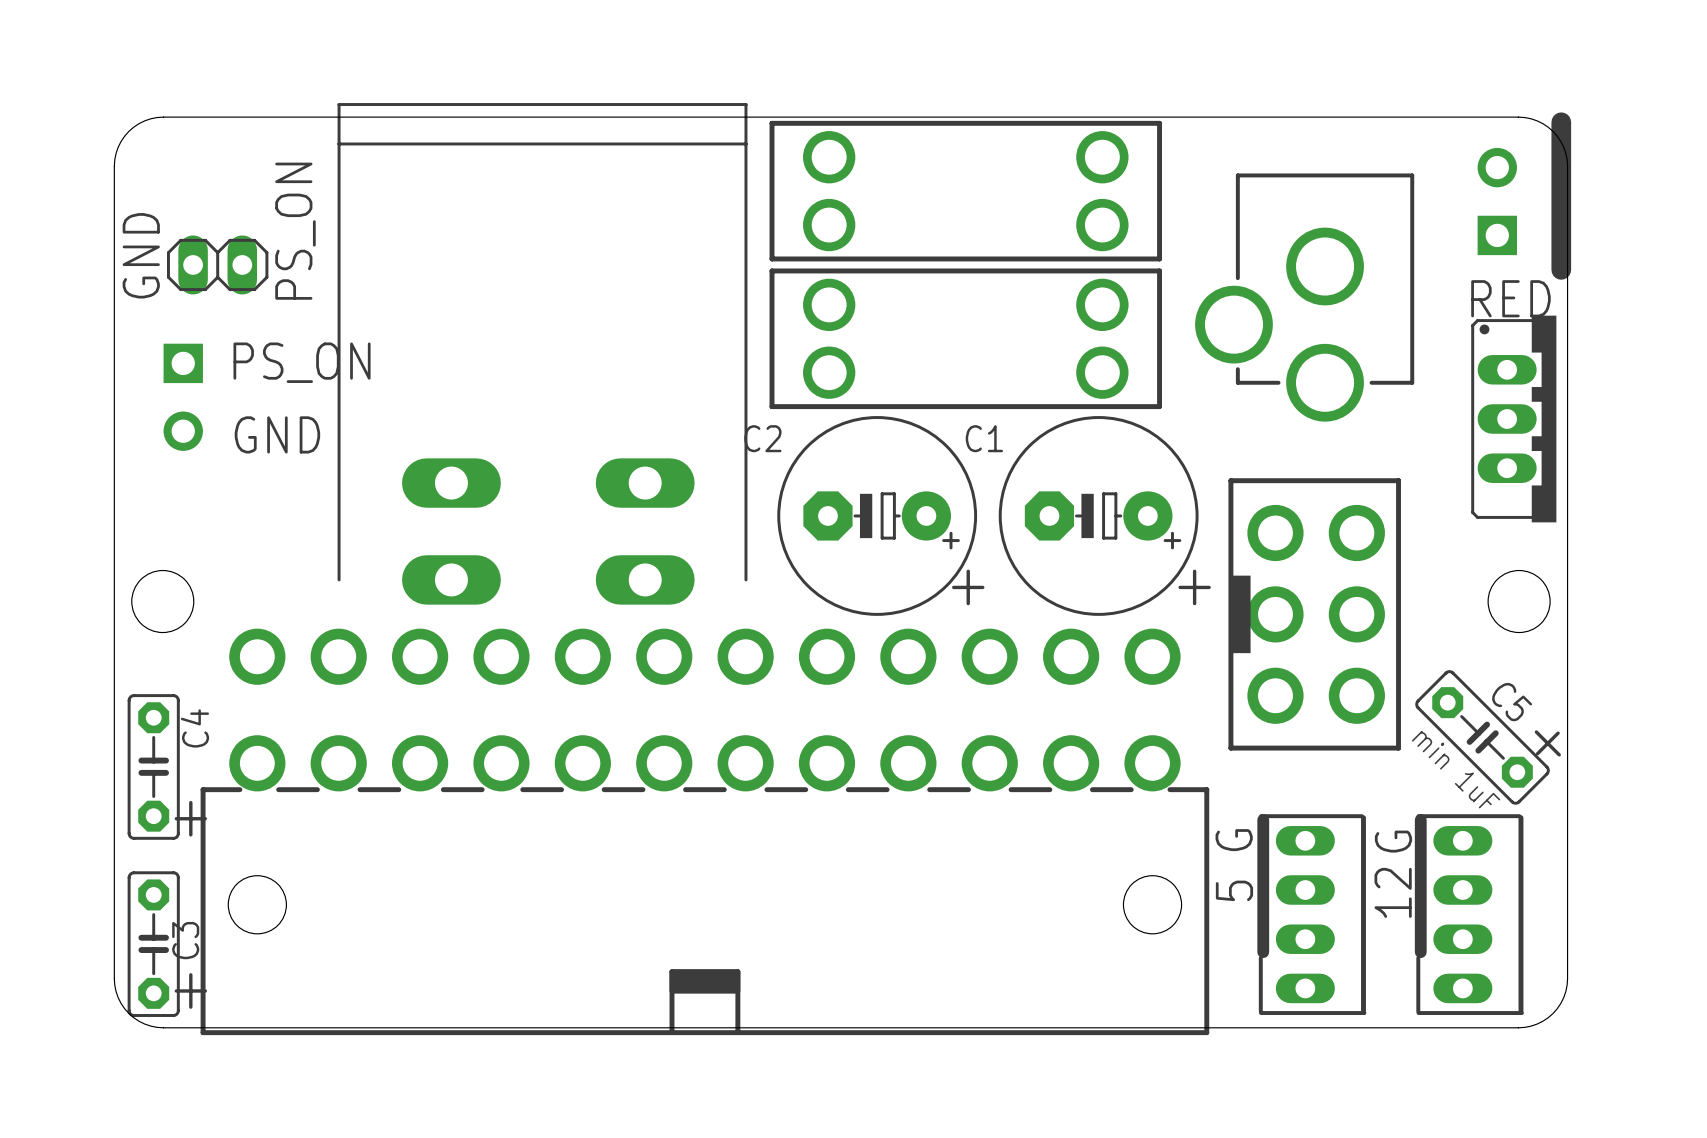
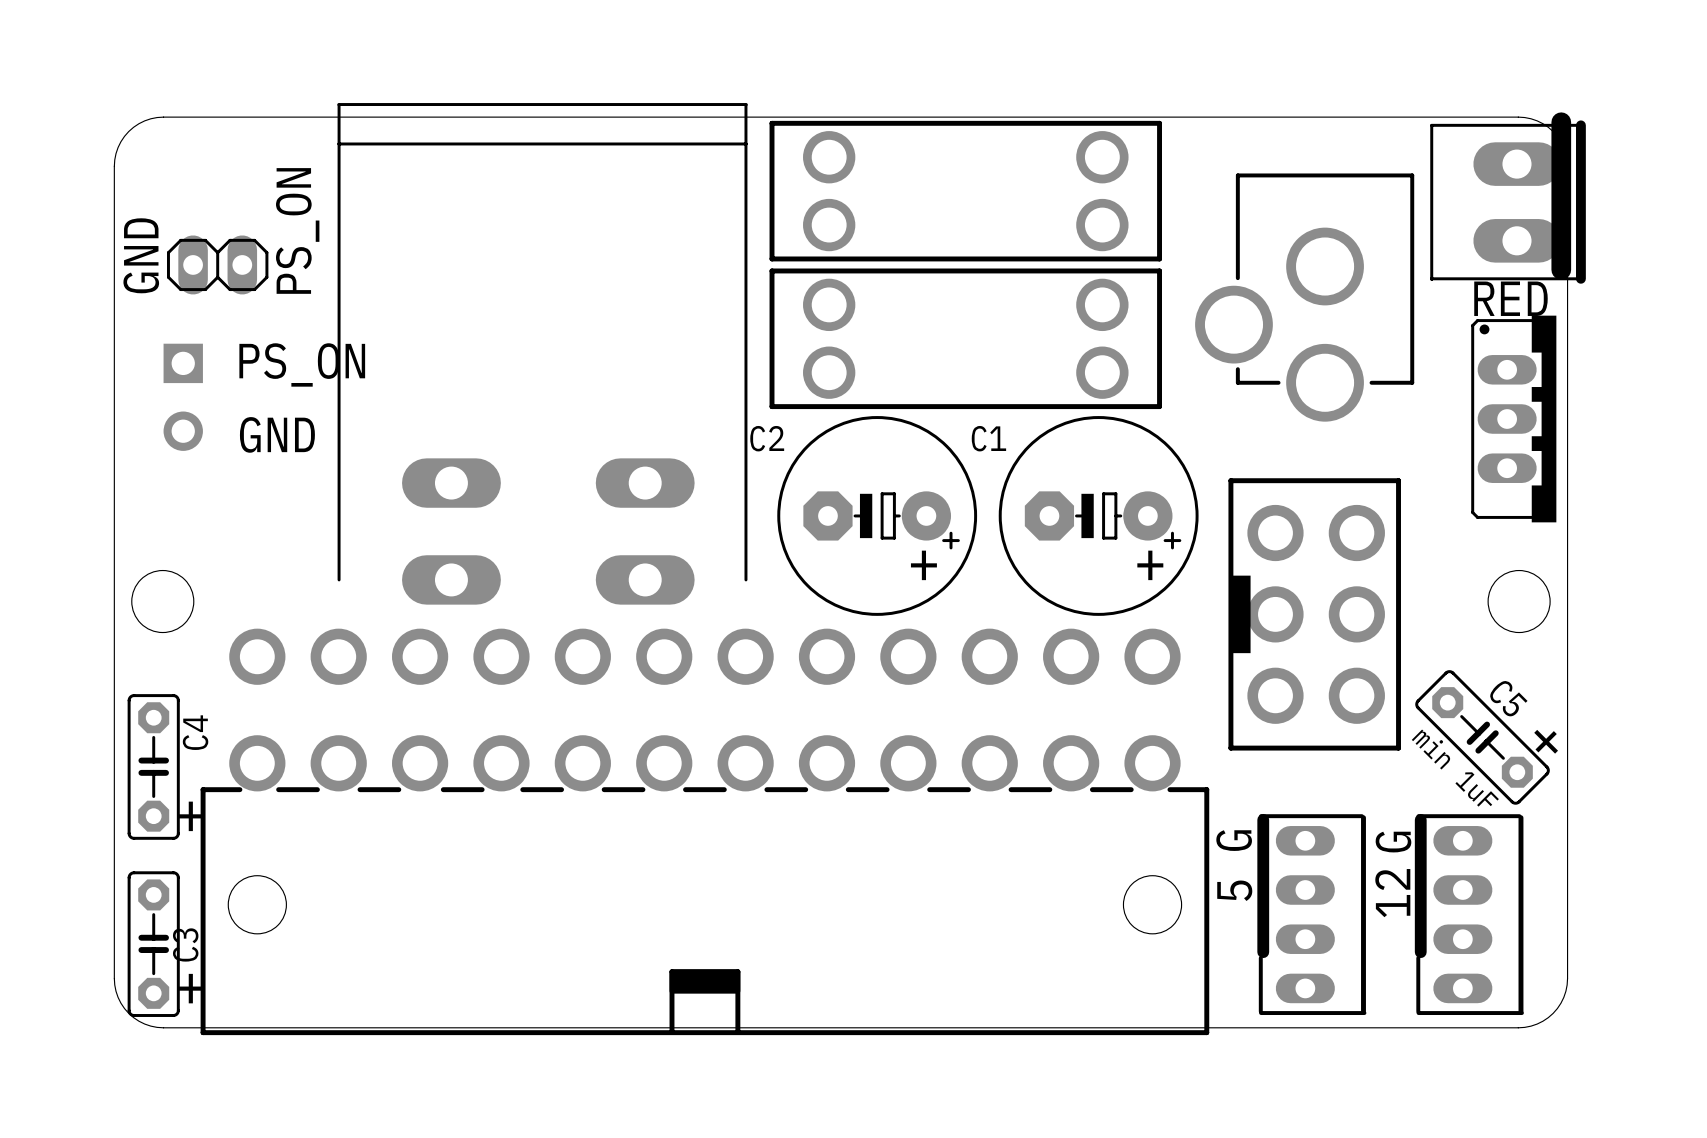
part footprint: [1477, 147, 1517, 256] -> [1430, 120, 1586, 284]
text position: + (968, 587) -> + (923, 565)
text position: + (1194, 587) -> + (1150, 565)

